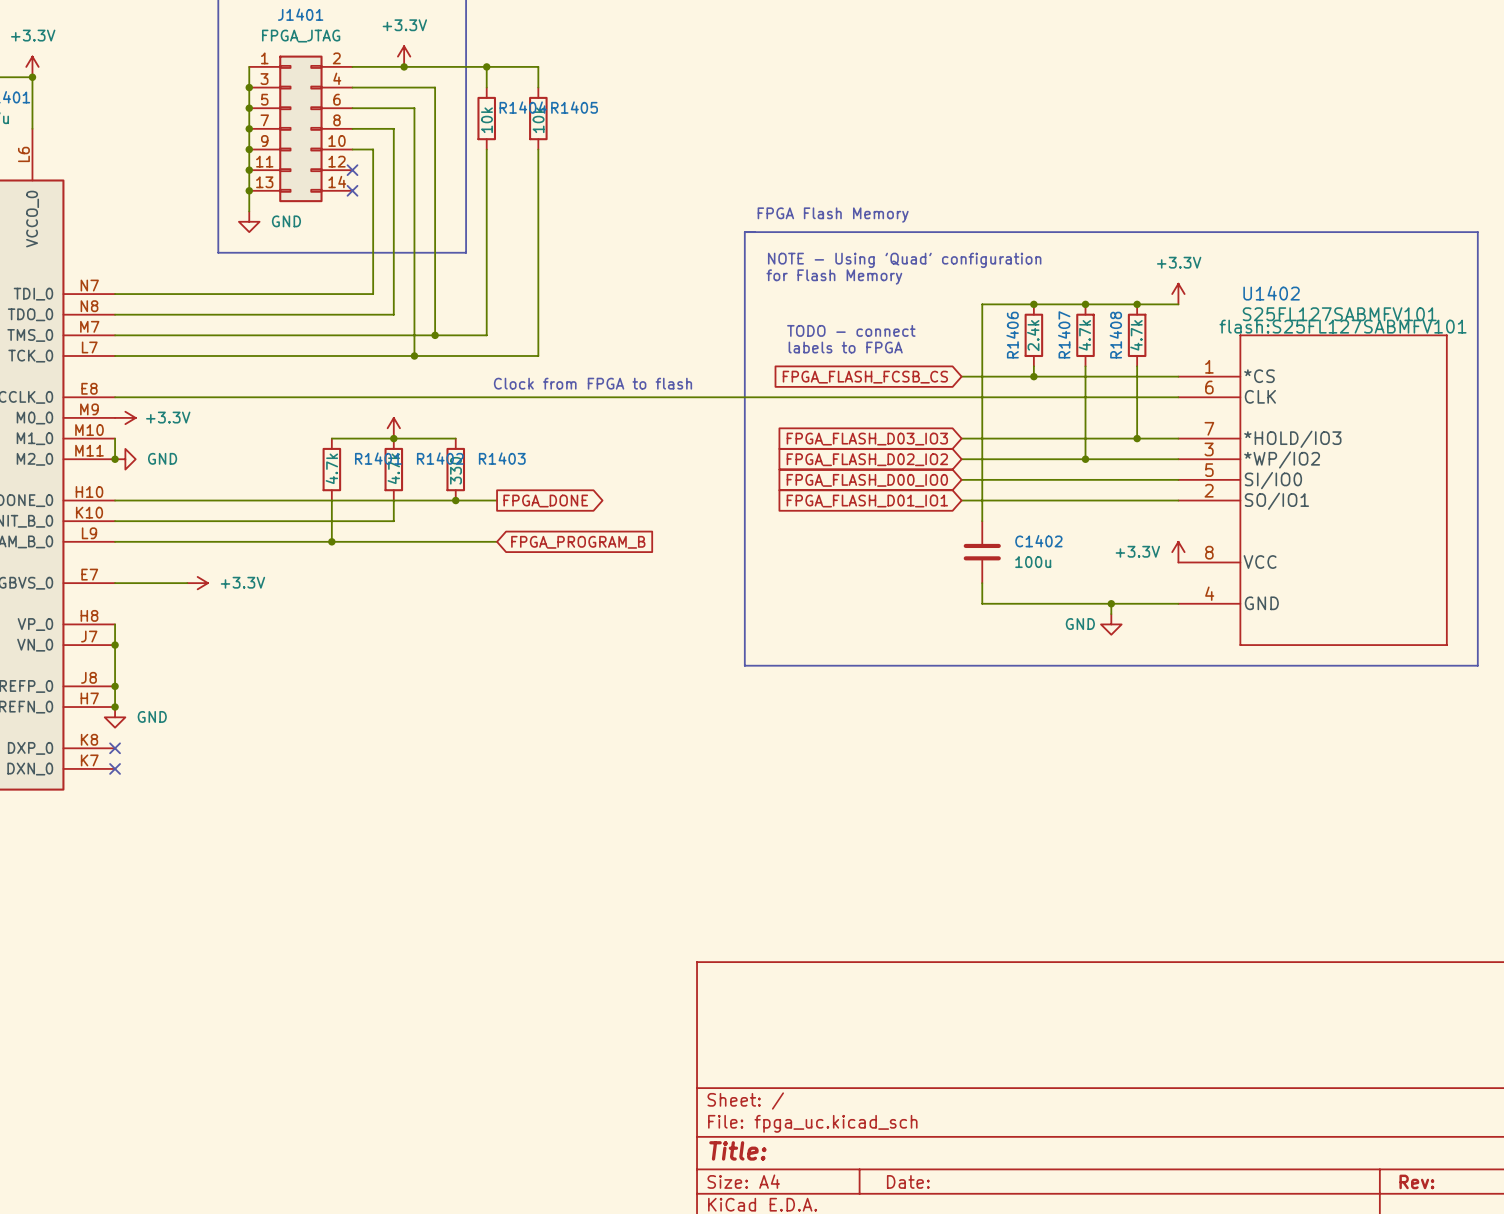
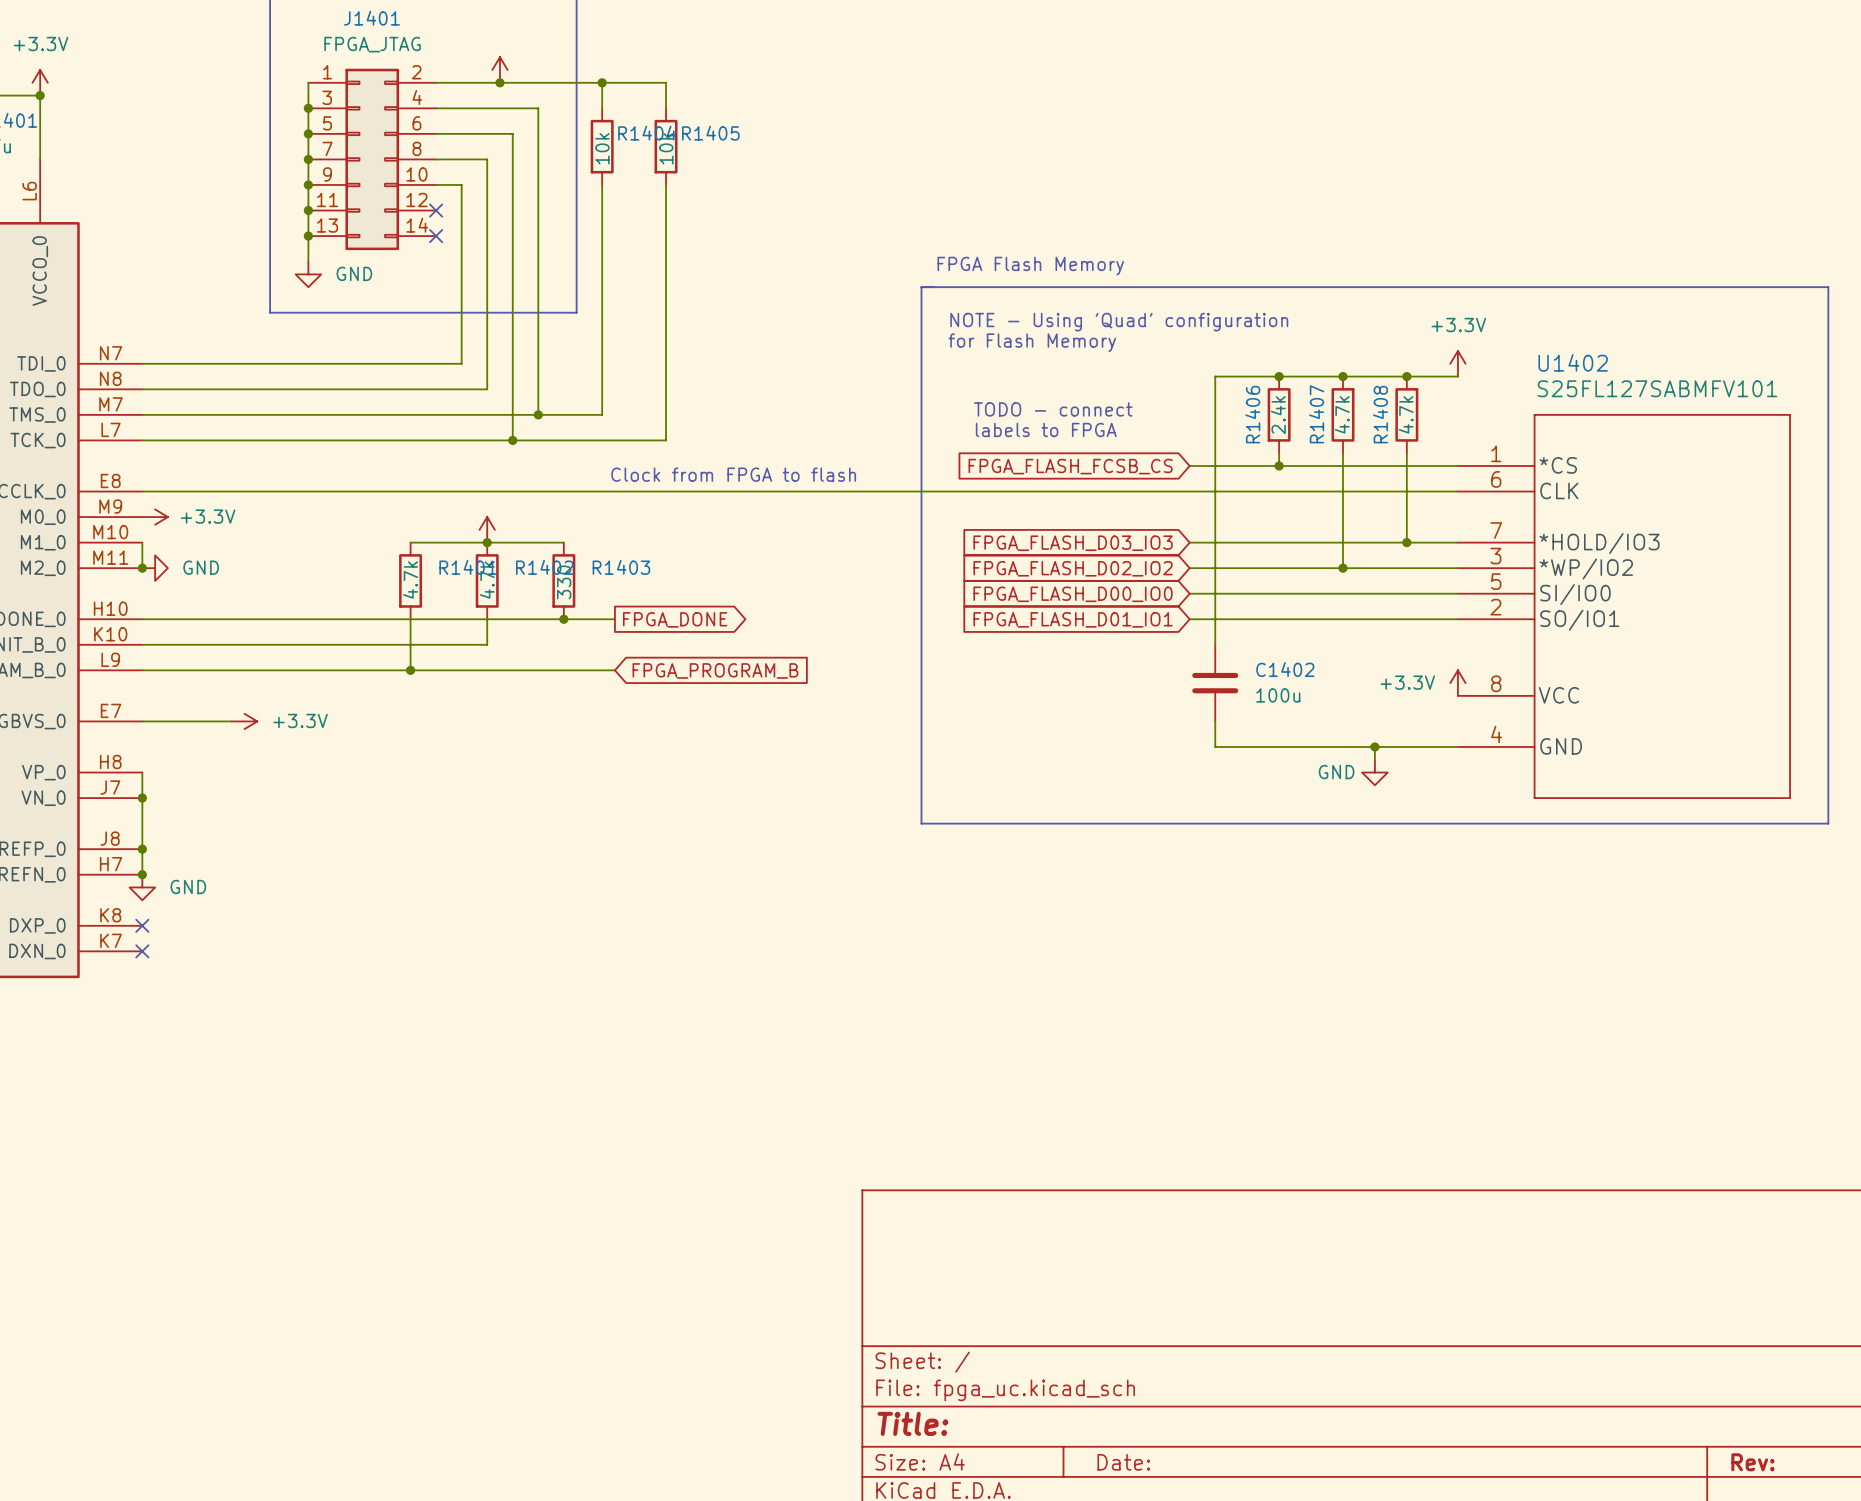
power symbol text: +3.3V (404, 25) -> none
U1402 text: flash:S25FL127SABMFV101 (1343, 326) -> none

